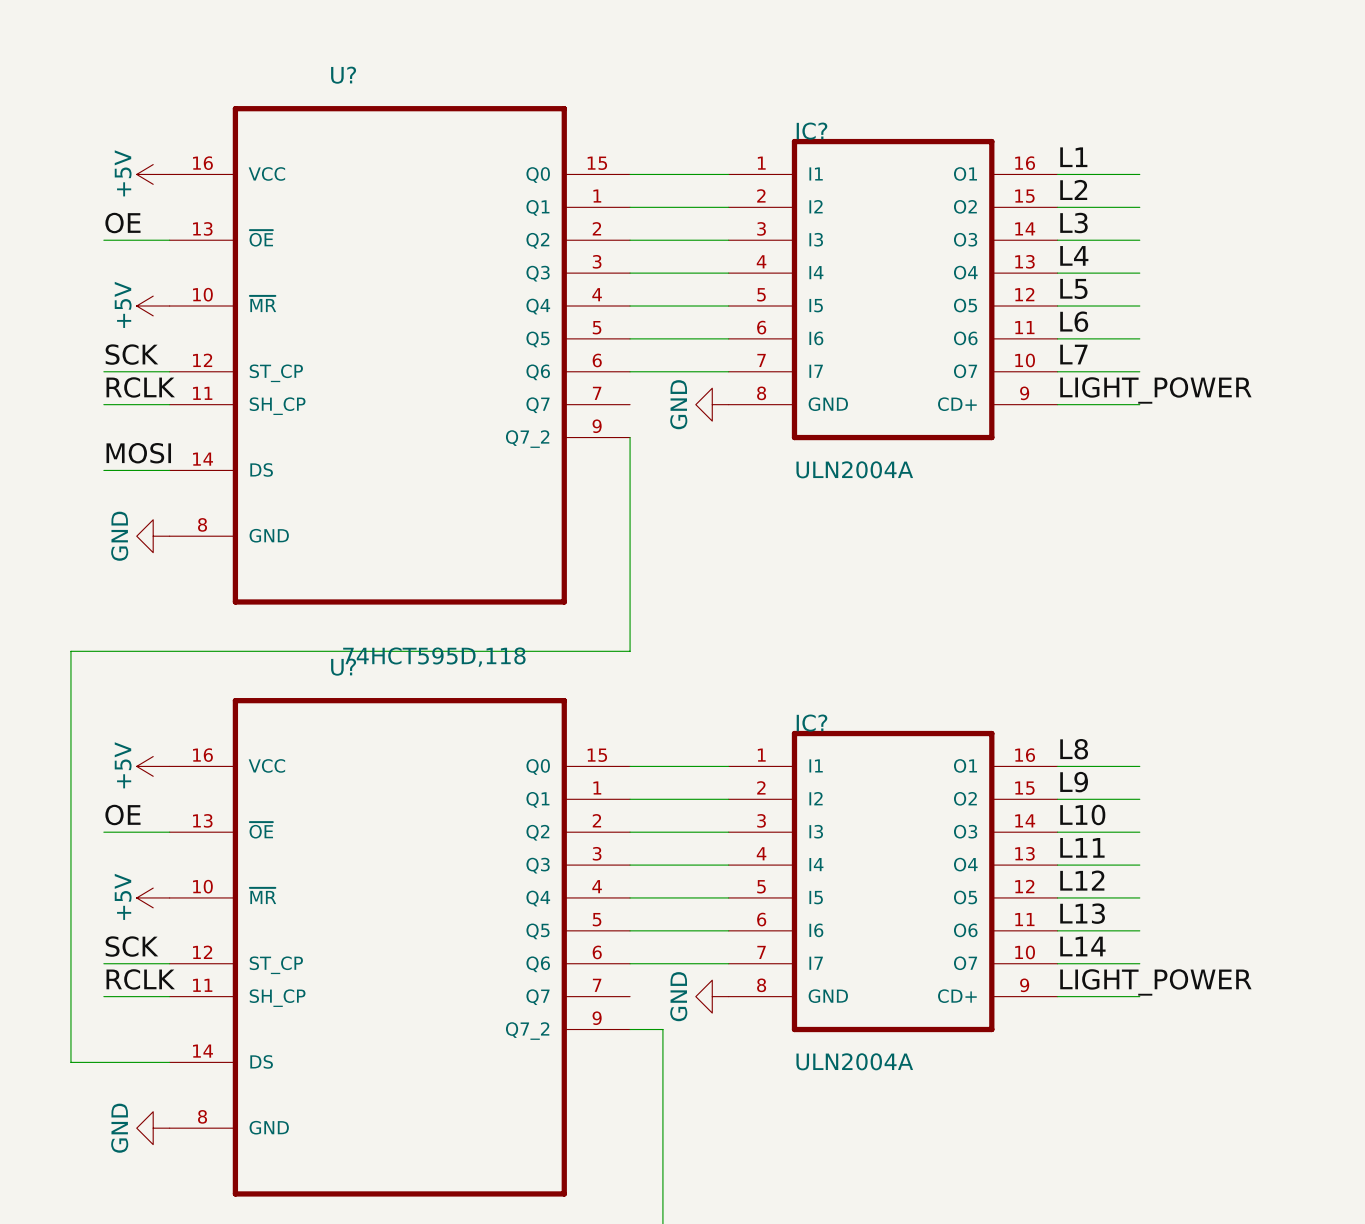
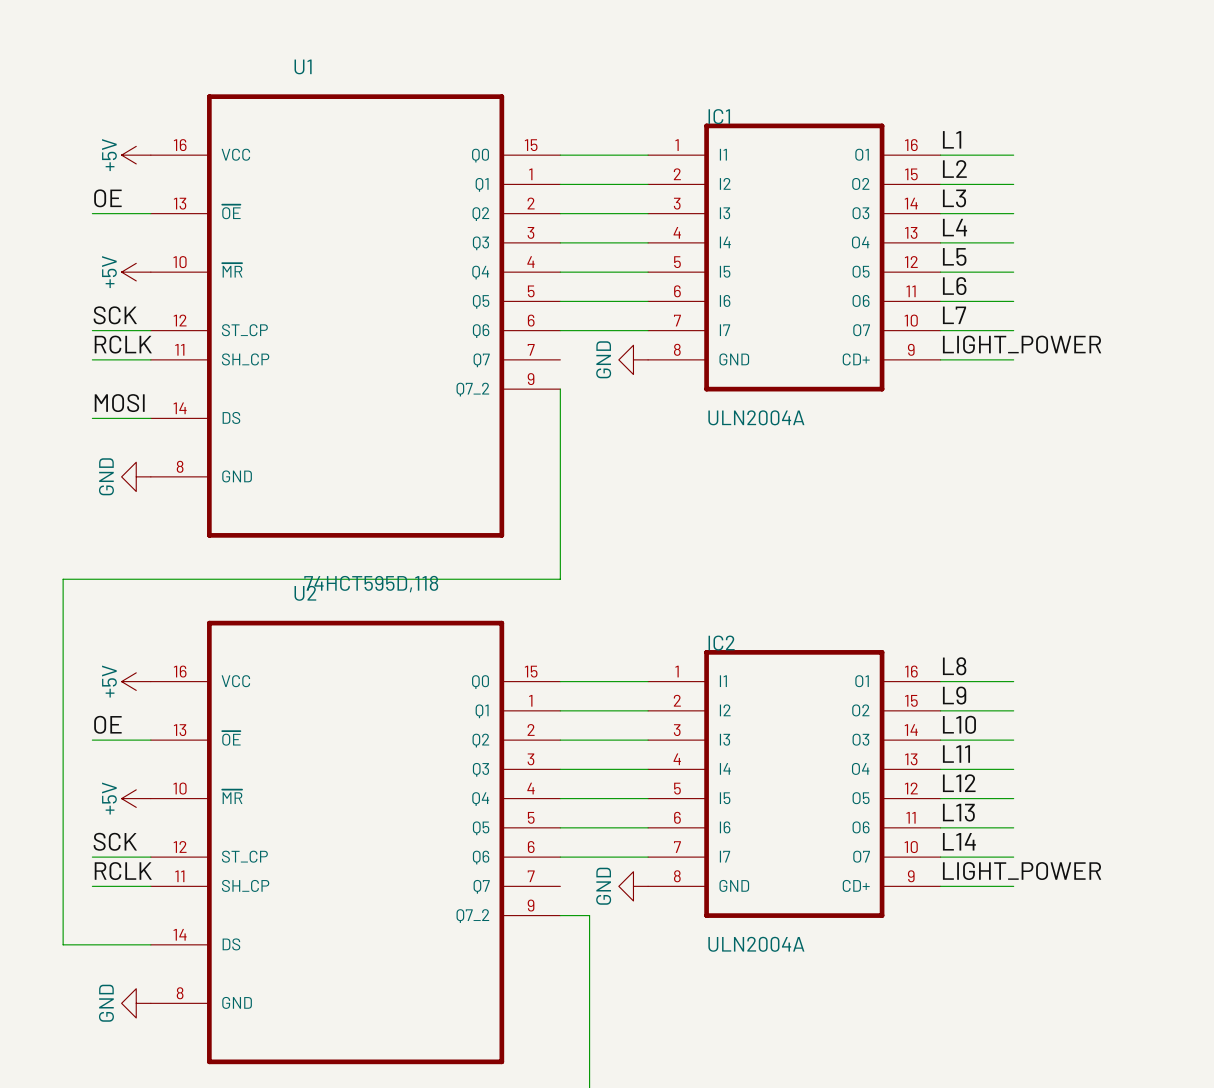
U? name: U? (343, 75) -> U1 (303, 66)
IC? name: IC? (811, 131) -> IC1 (719, 116)
U? name: U? (343, 667) -> U2 (305, 593)
IC? name: IC? (811, 723) -> IC2 (721, 643)

